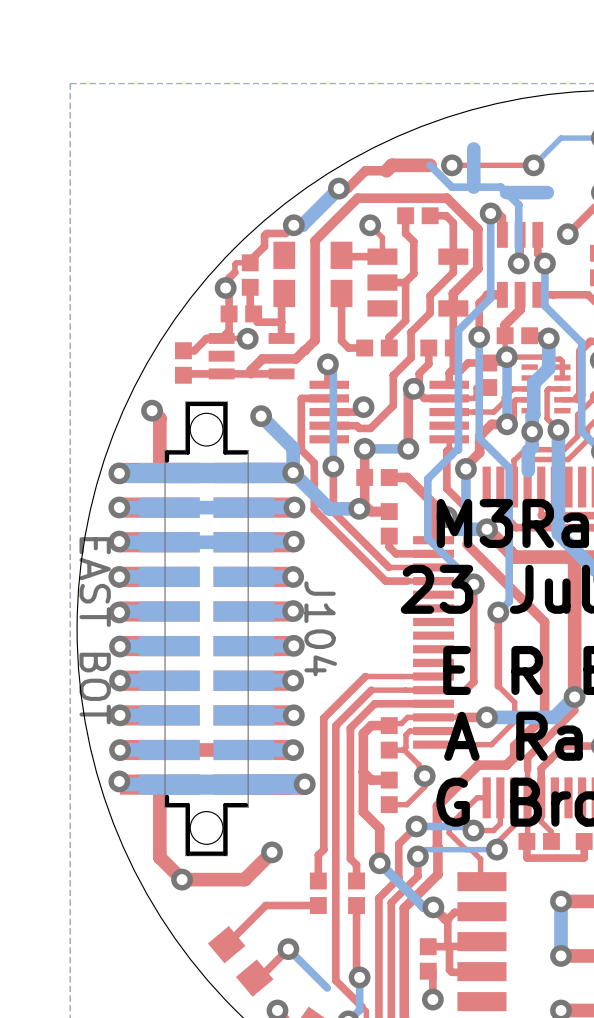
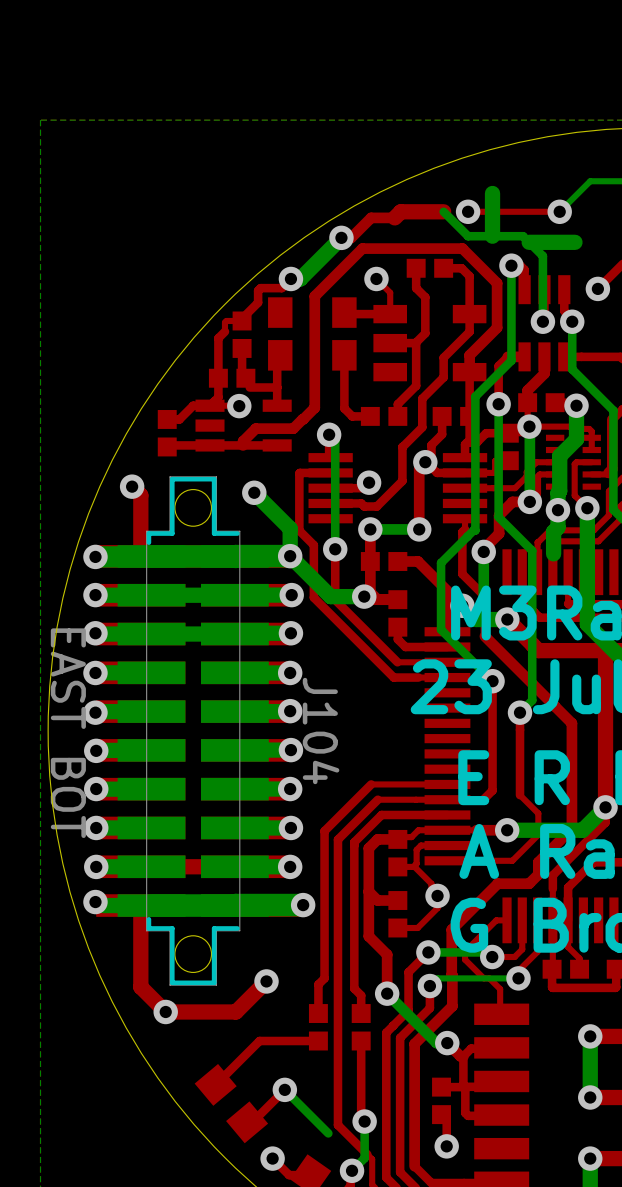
via: (225, 288) -> none

